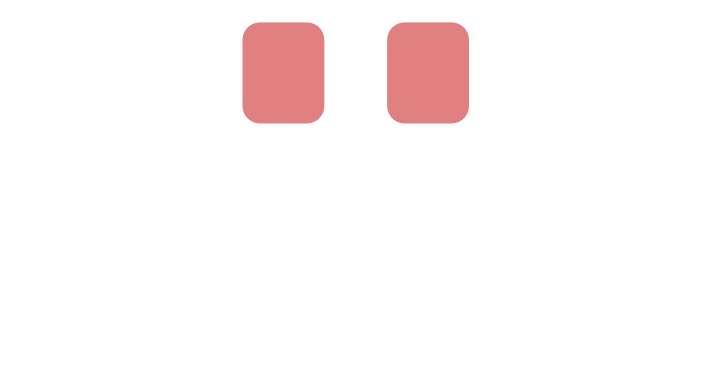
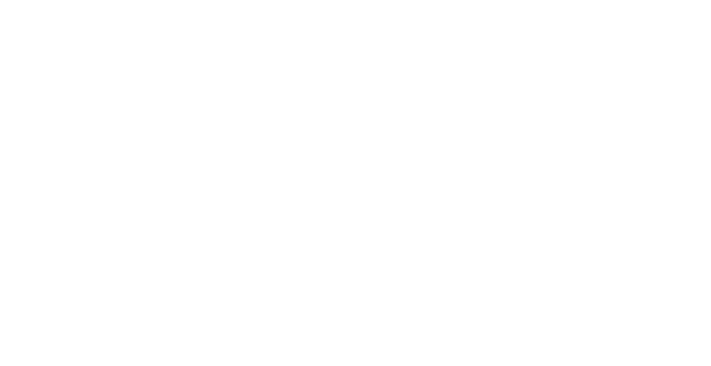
part: (355, 72) -> none

